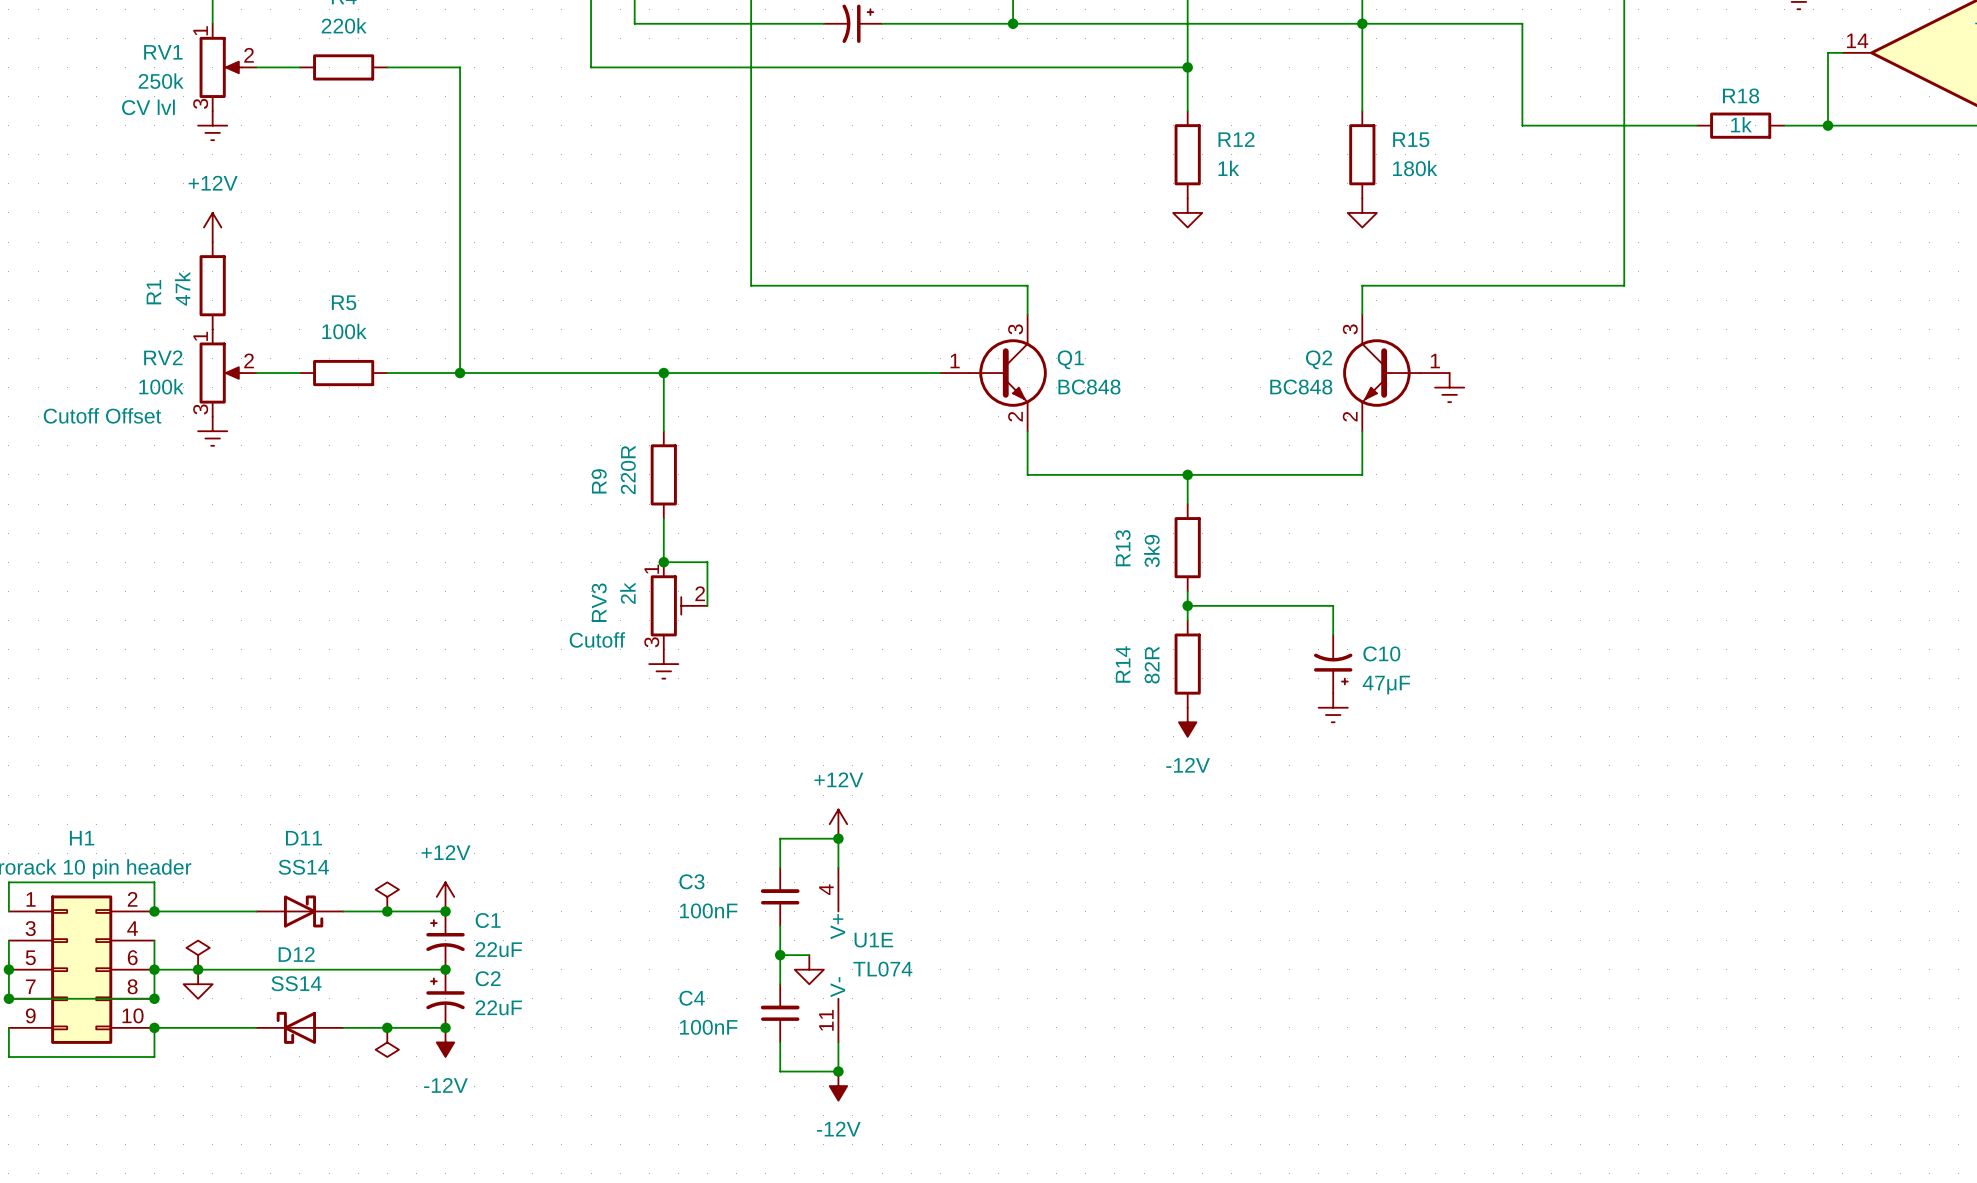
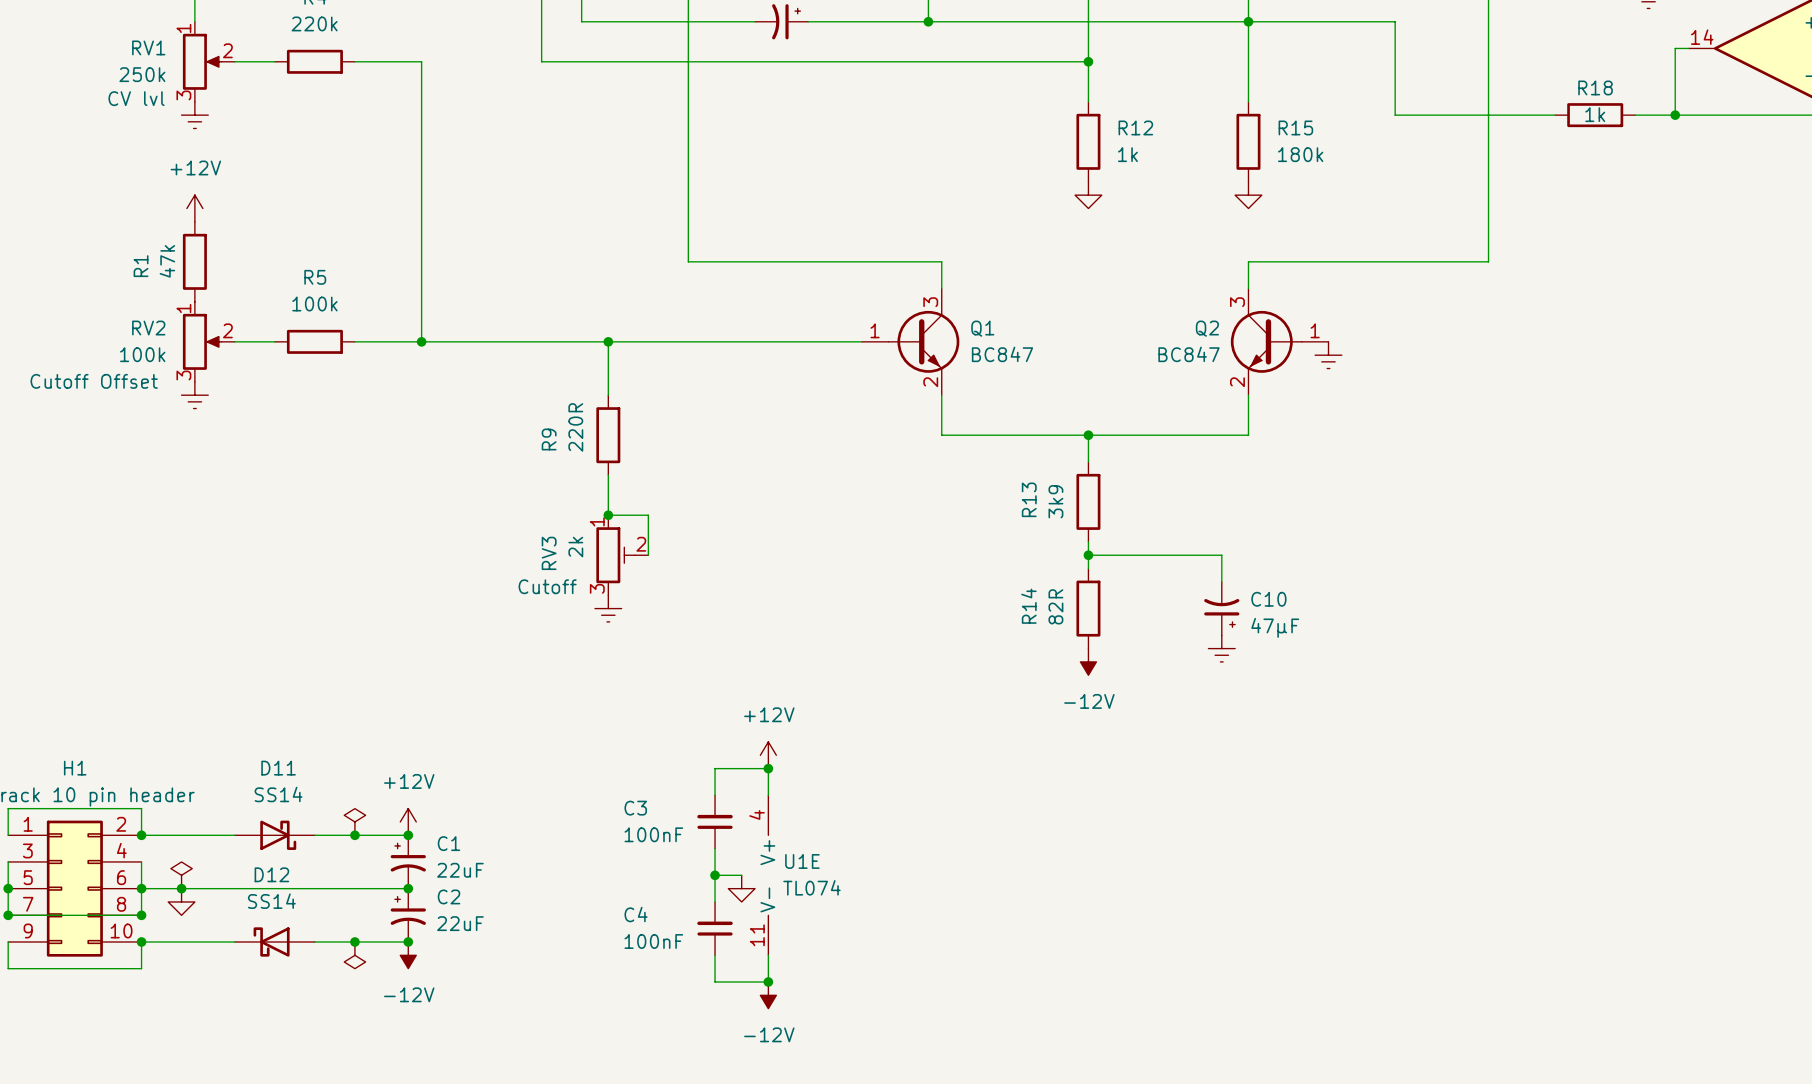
Q1 value: BC848 (1089, 387) -> BC847 (1002, 354)
Q2 value: BC848 (1301, 387) -> BC847 (1188, 354)

